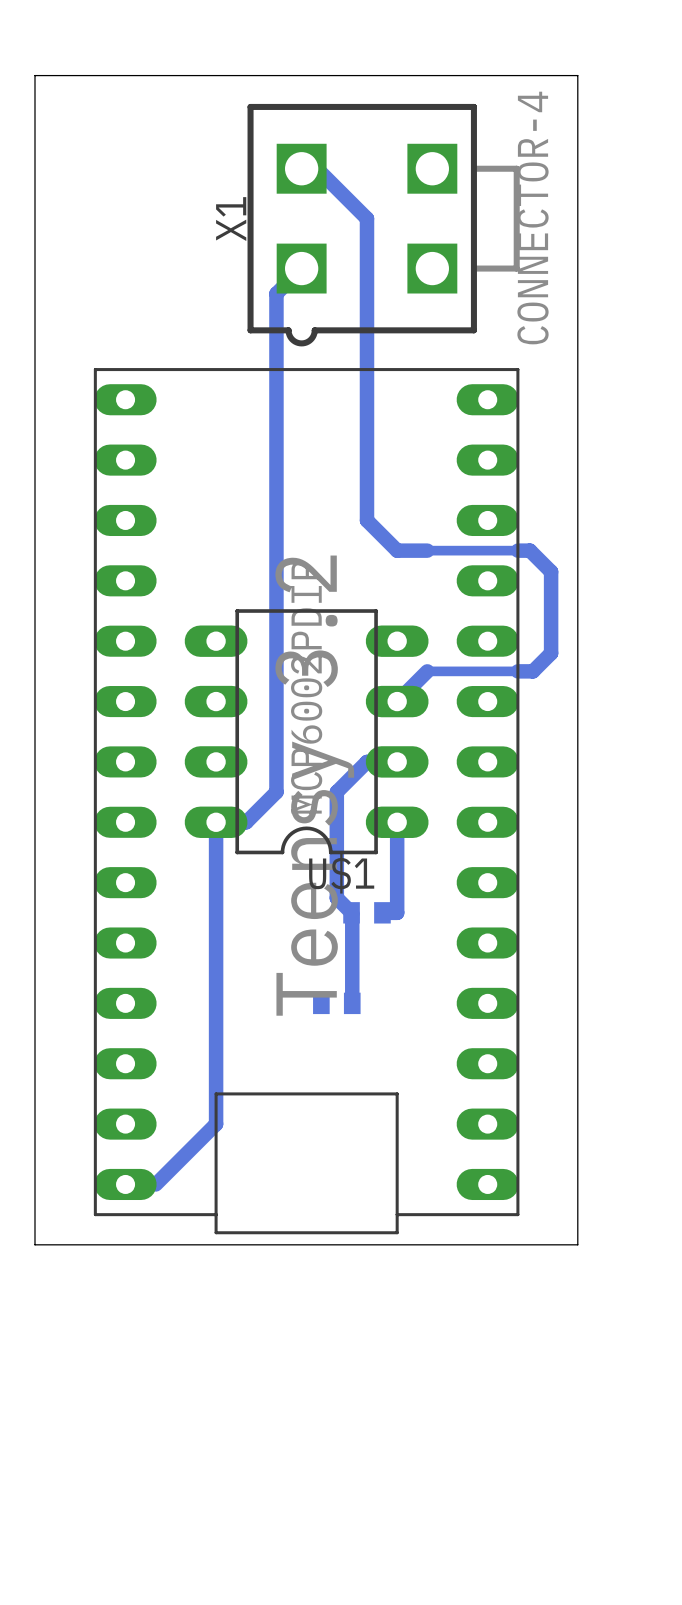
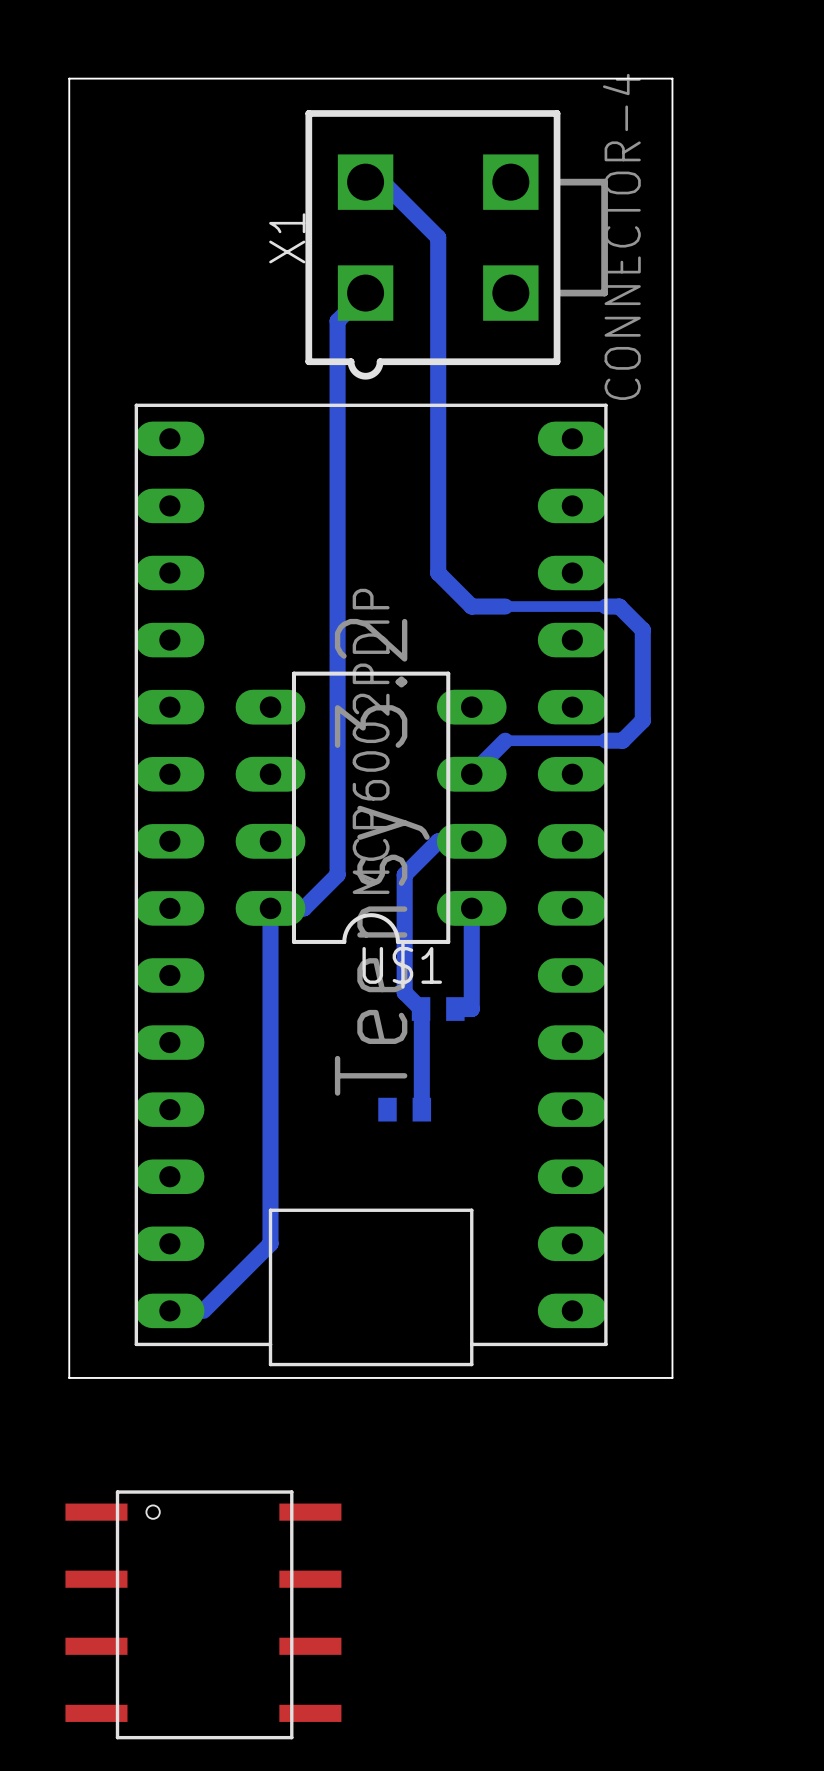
part: none -> (203, 1614)

